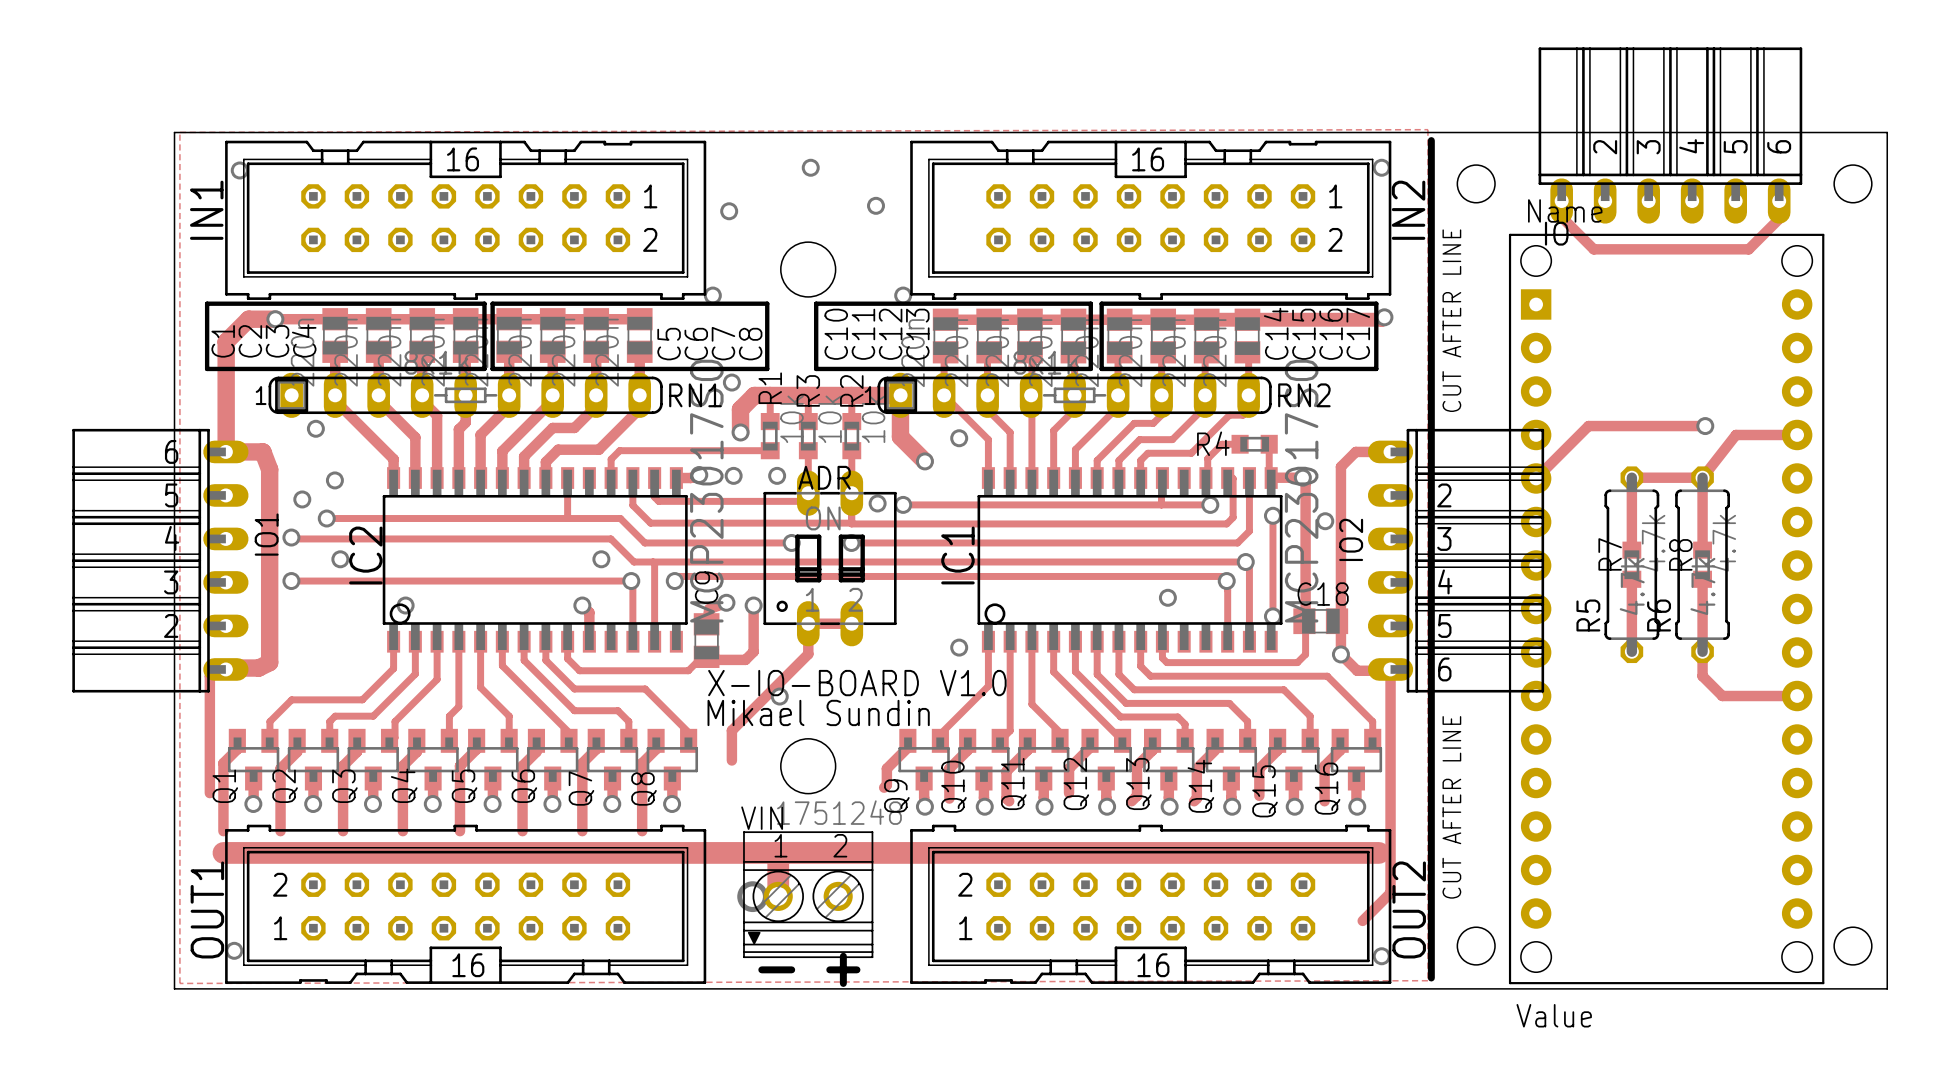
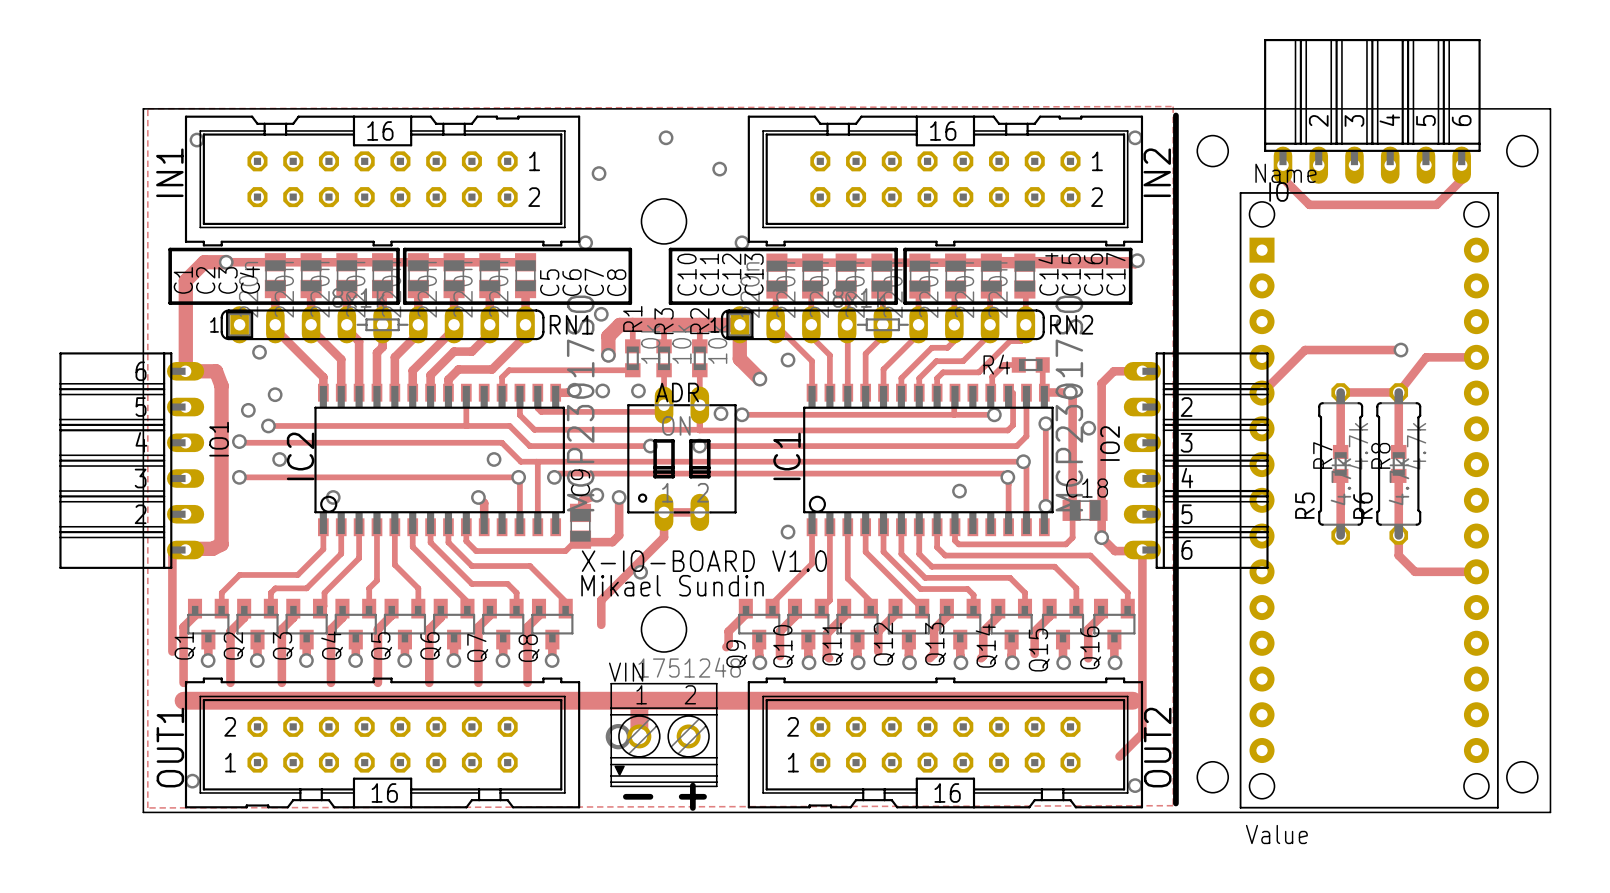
text: CUT AFTER LINE (1451, 320) -> none
text: CUT AFTER LINE (1451, 807) -> none

